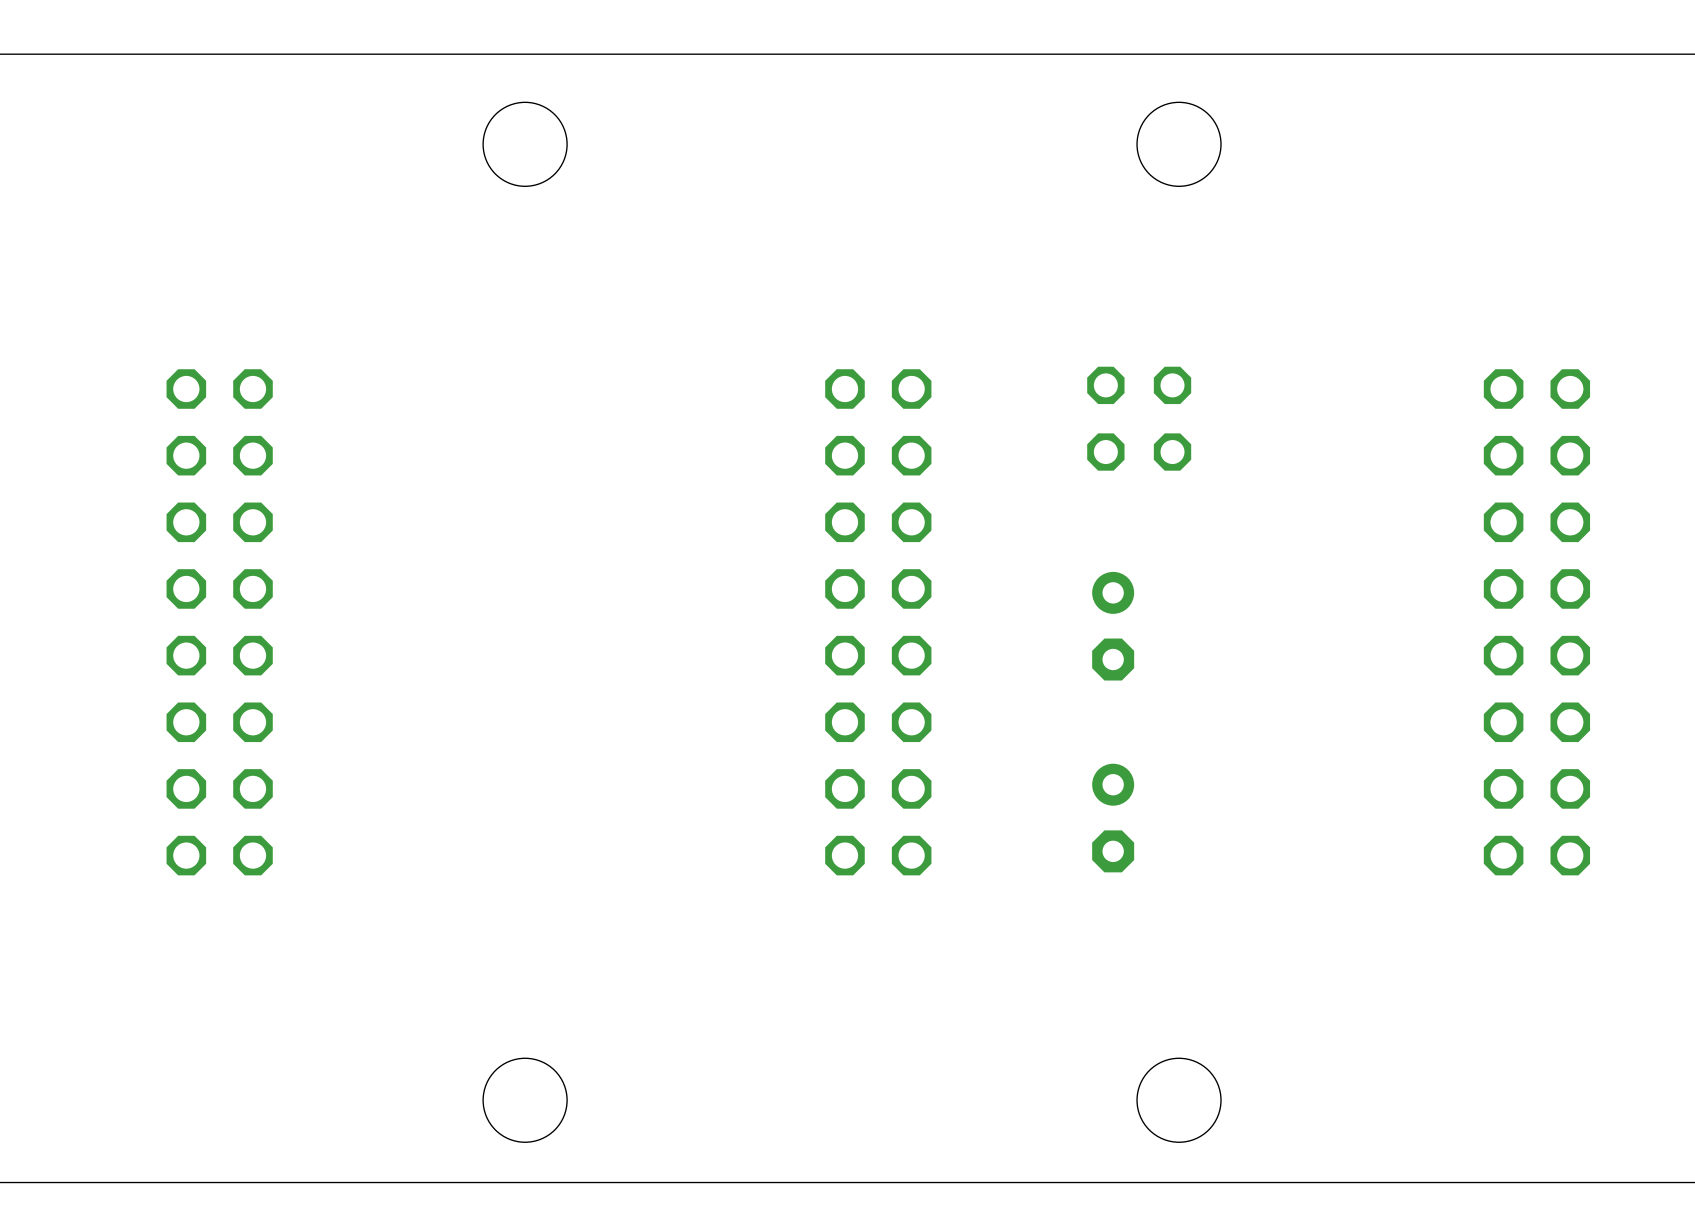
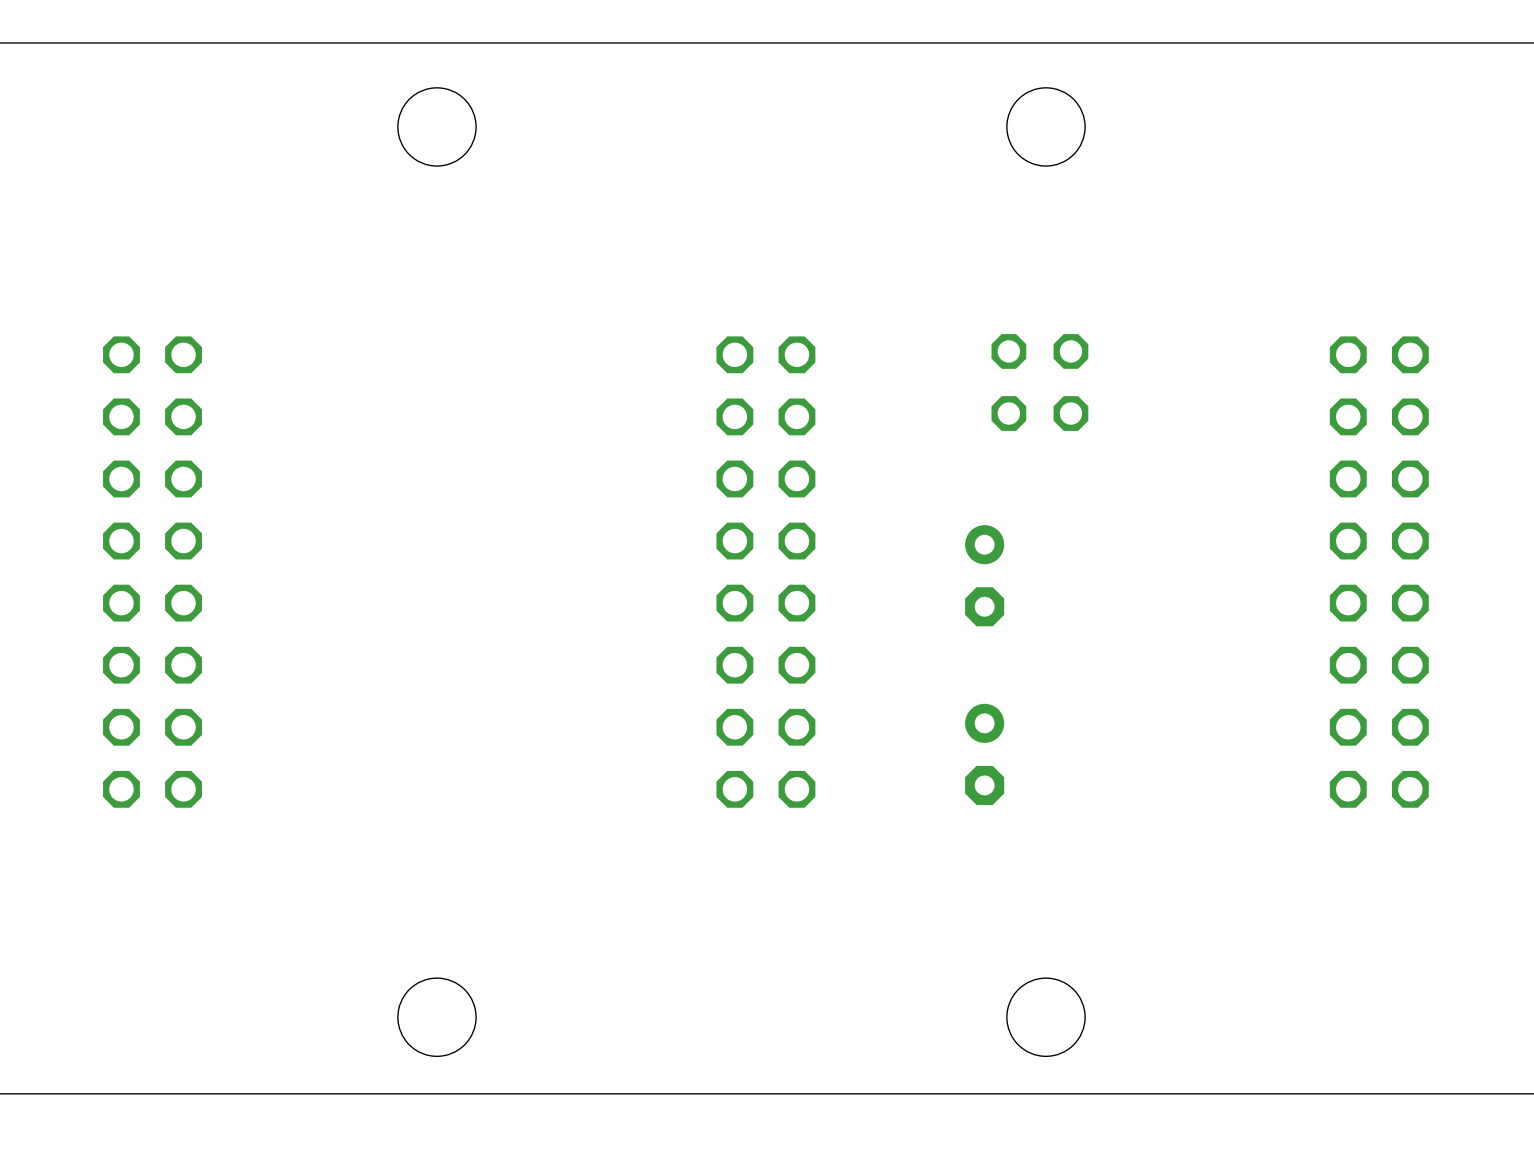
part position: (1139, 418) -> (1039, 382)

